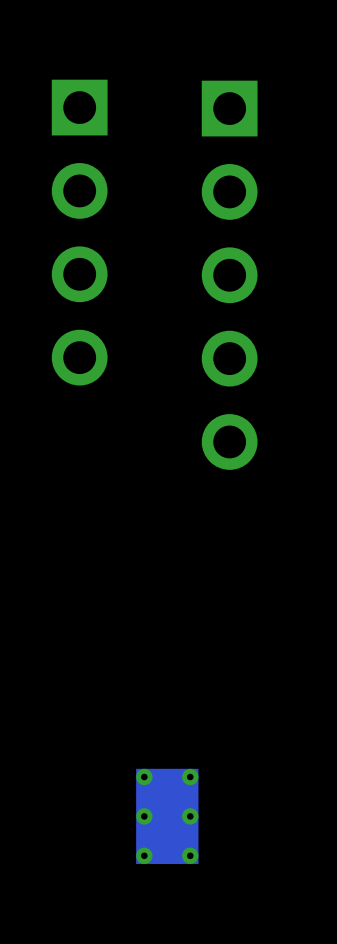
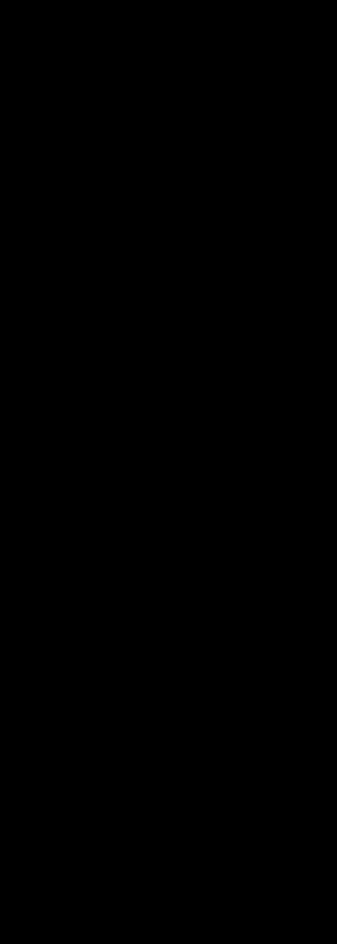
part: (79, 232) -> none
part: (229, 275) -> none
part: (167, 816) -> none

